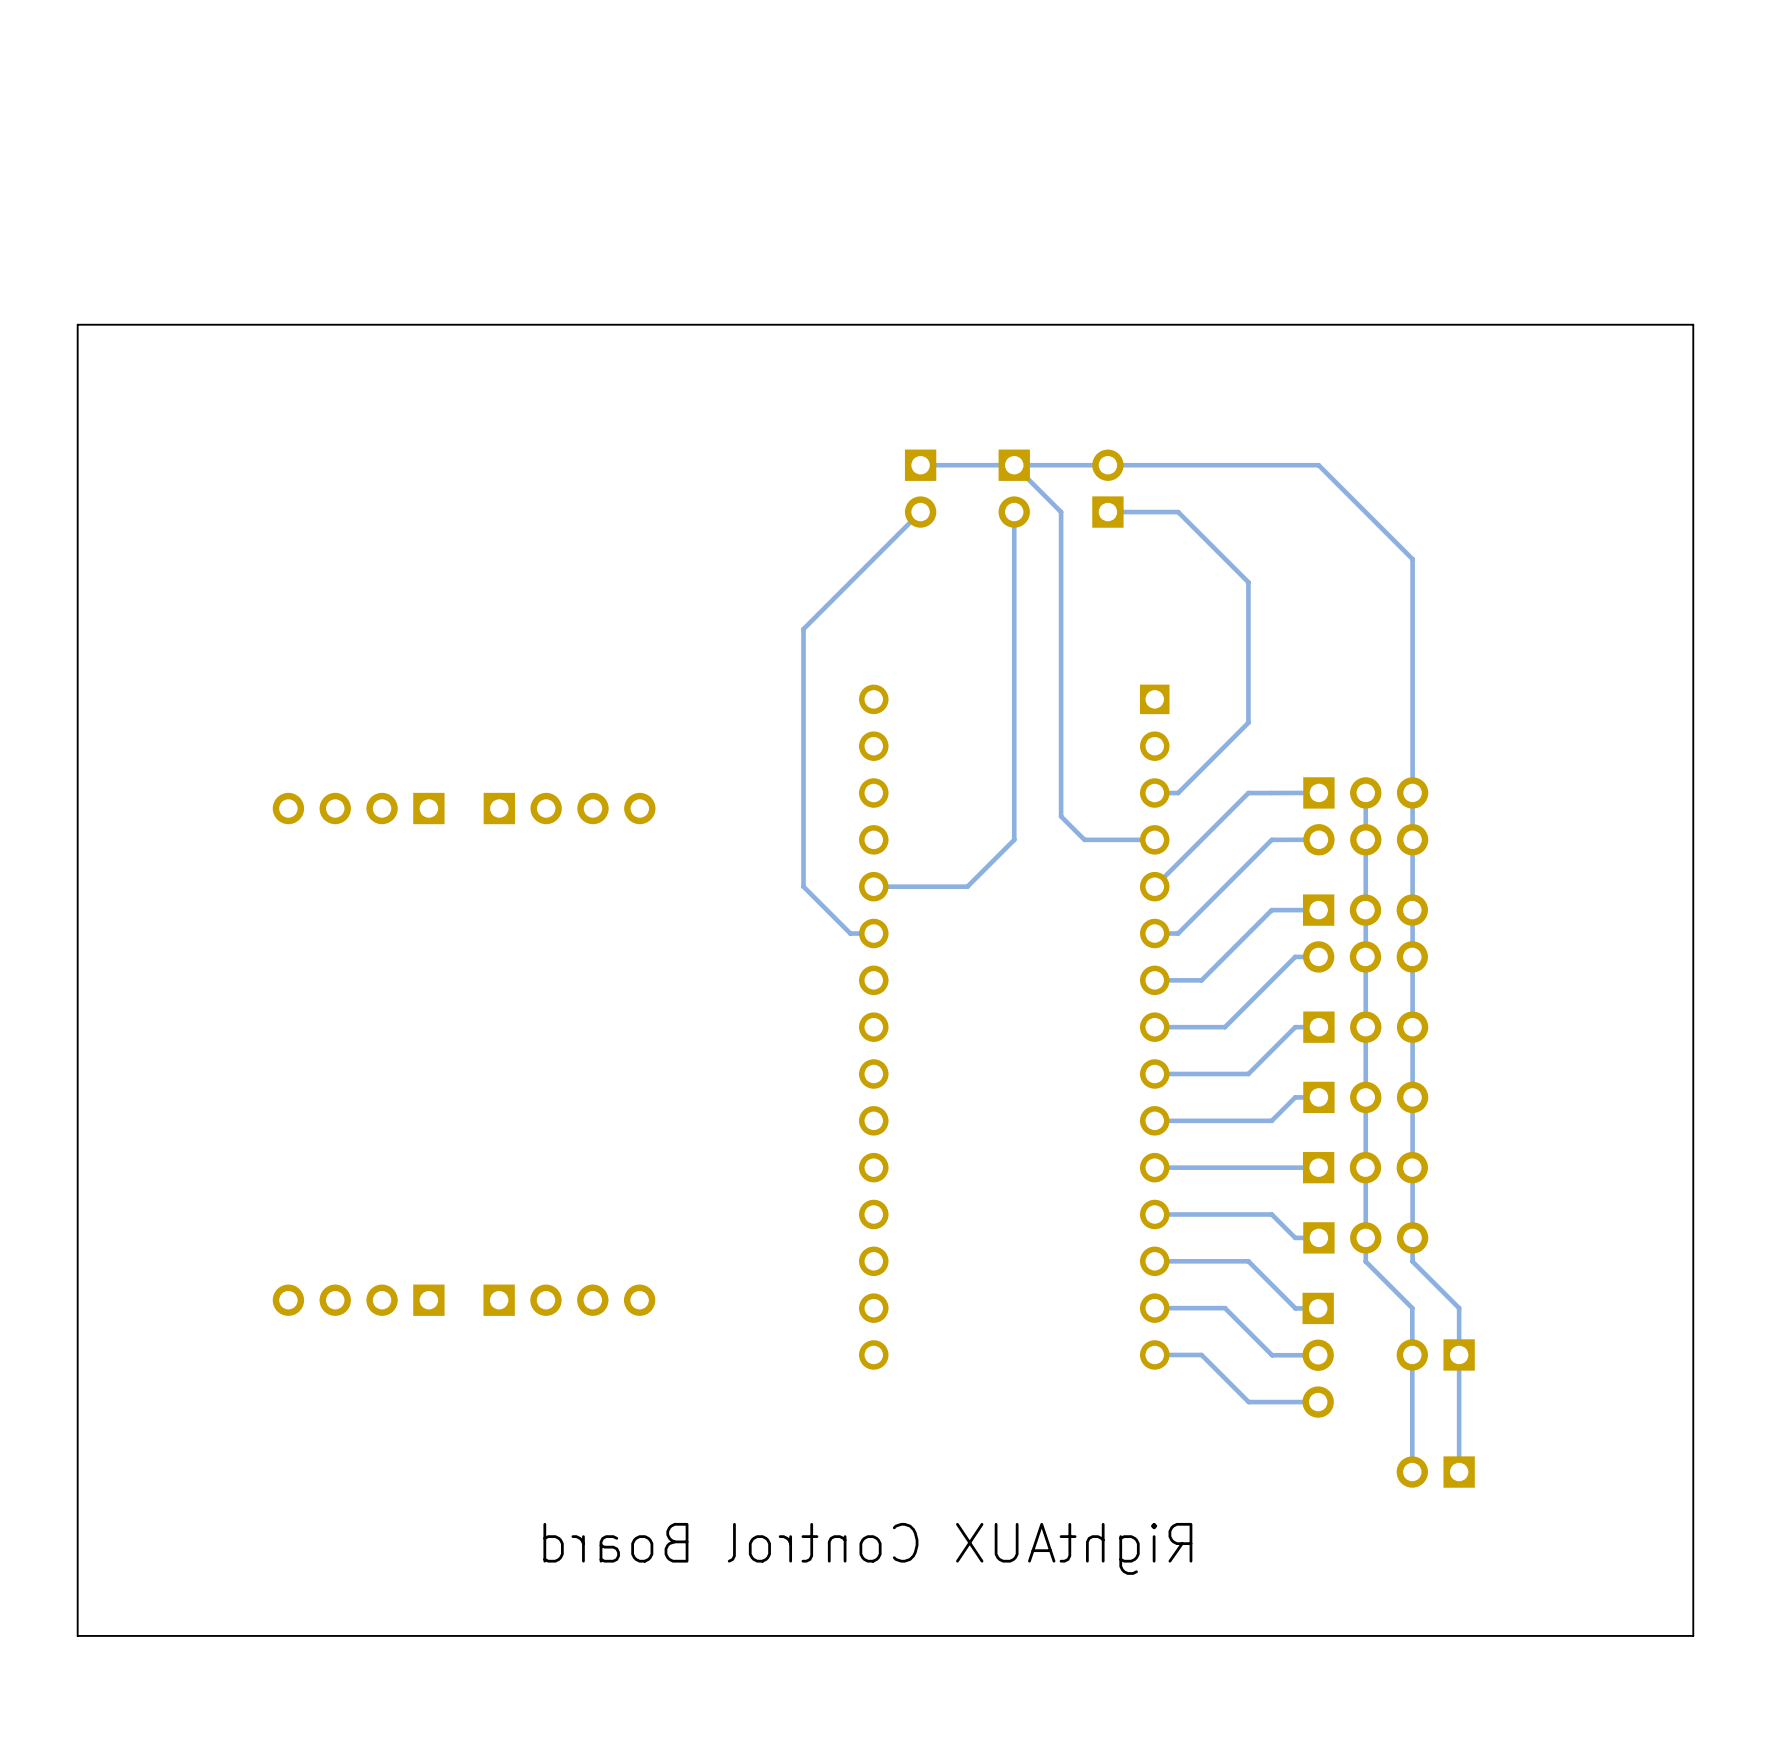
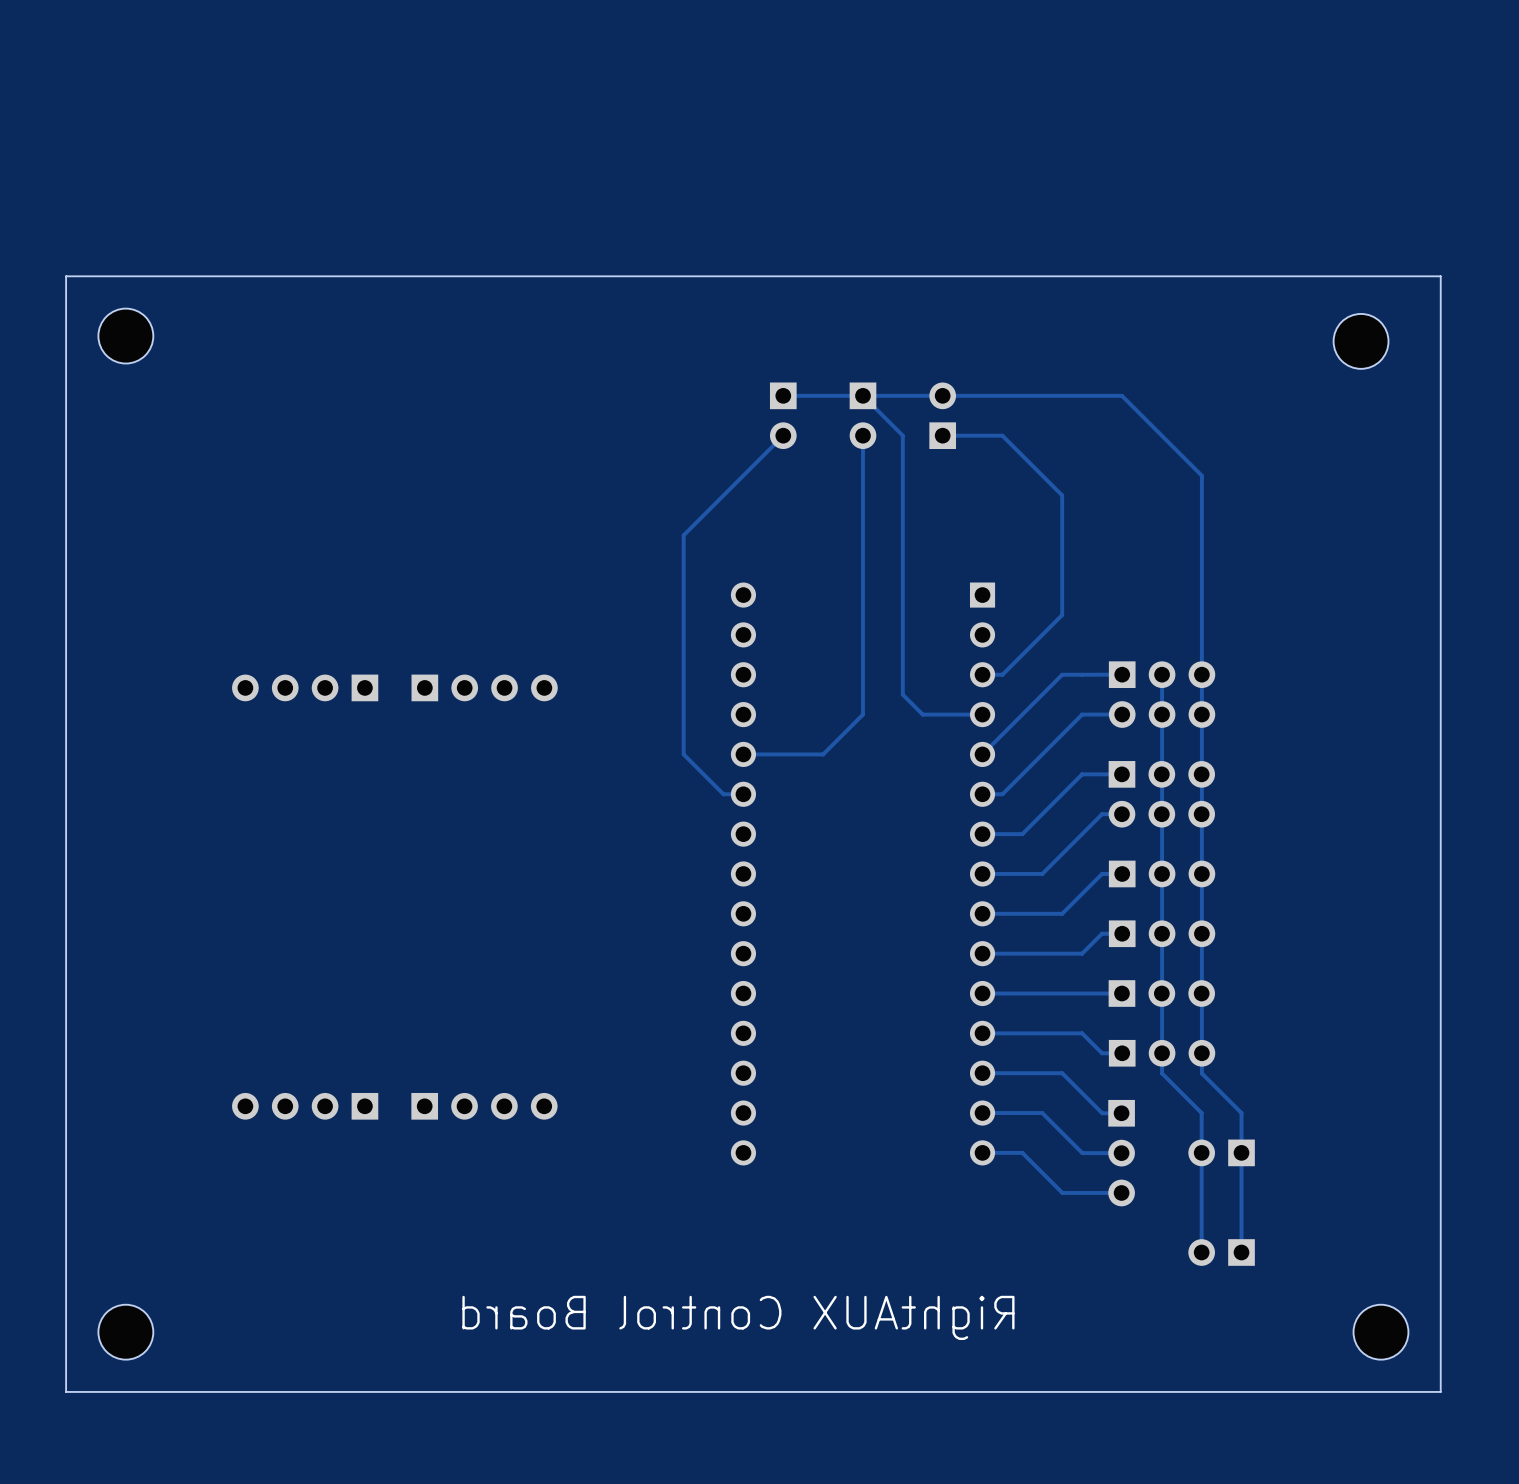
part: none -> (125, 336)
part: none -> (1361, 341)
part: none -> (125, 1332)
part: none -> (1380, 1332)

